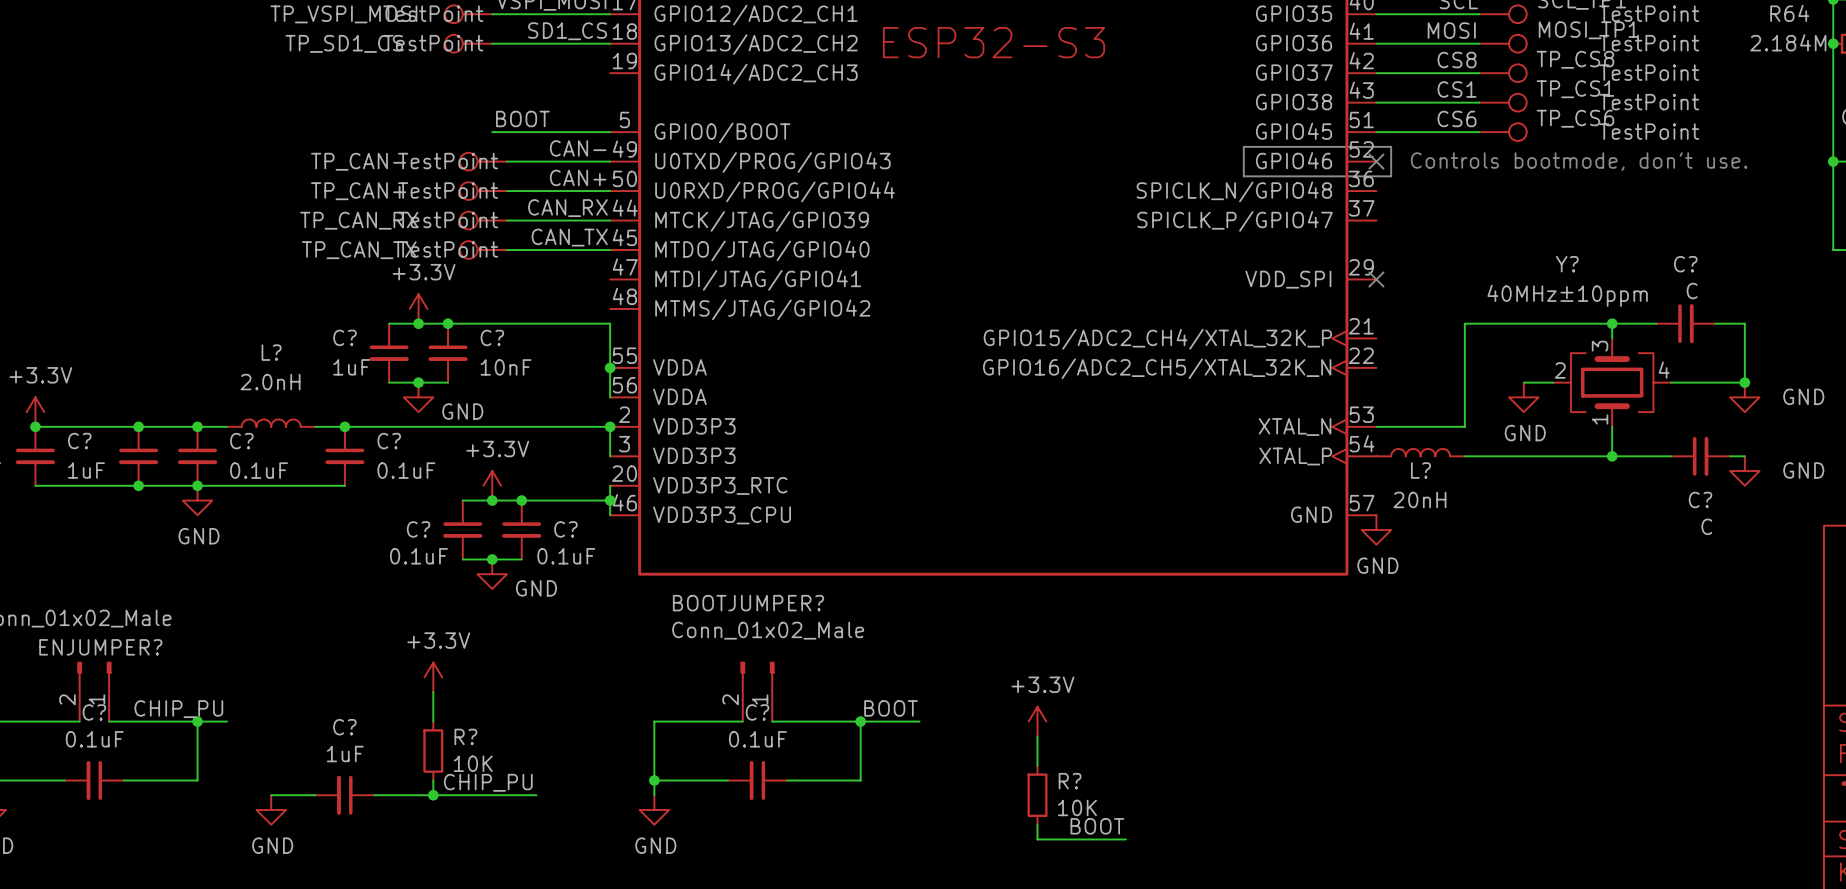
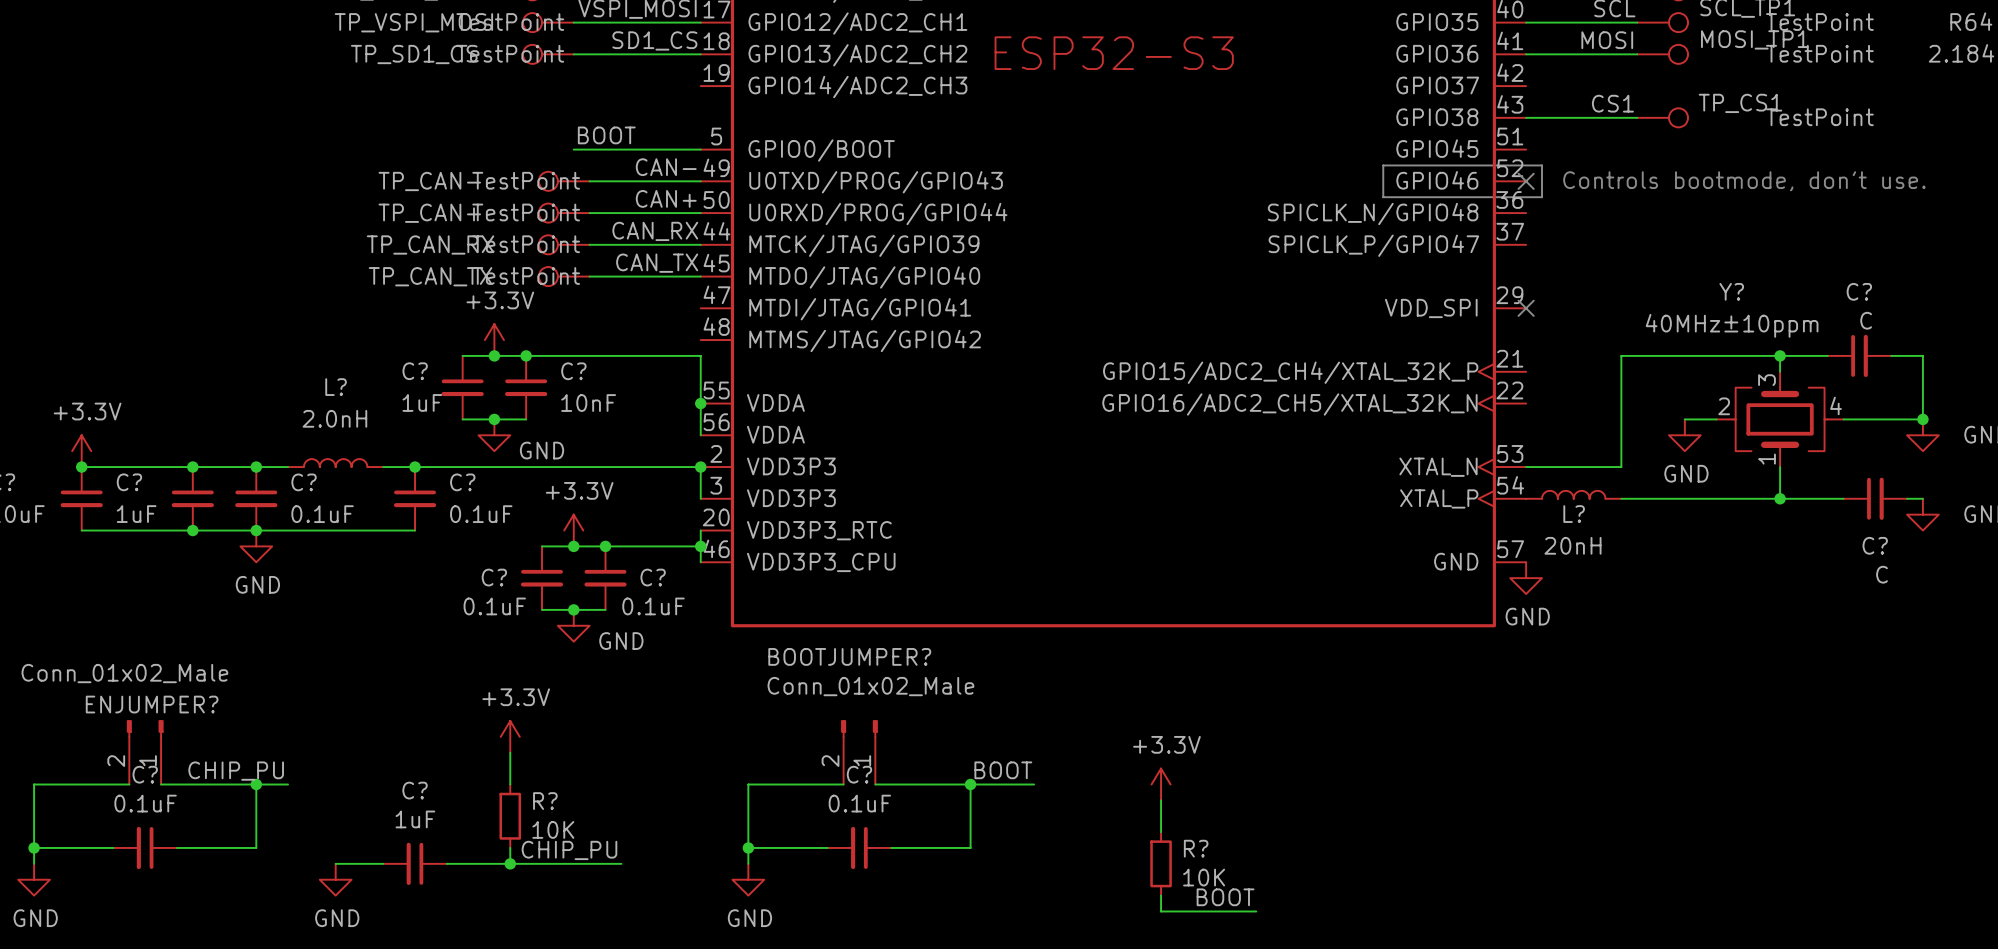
label: CS8 (1457, 60) -> none
wire: (1376, 73) (1479, 73) -> none
TP_CS8: TestPoint (1503, 73) -> none
label: CS6 (1457, 118) -> none
wire: (1376, 132) (1479, 132) -> none
TP_CS6: TestPoint (1503, 132) -> none

